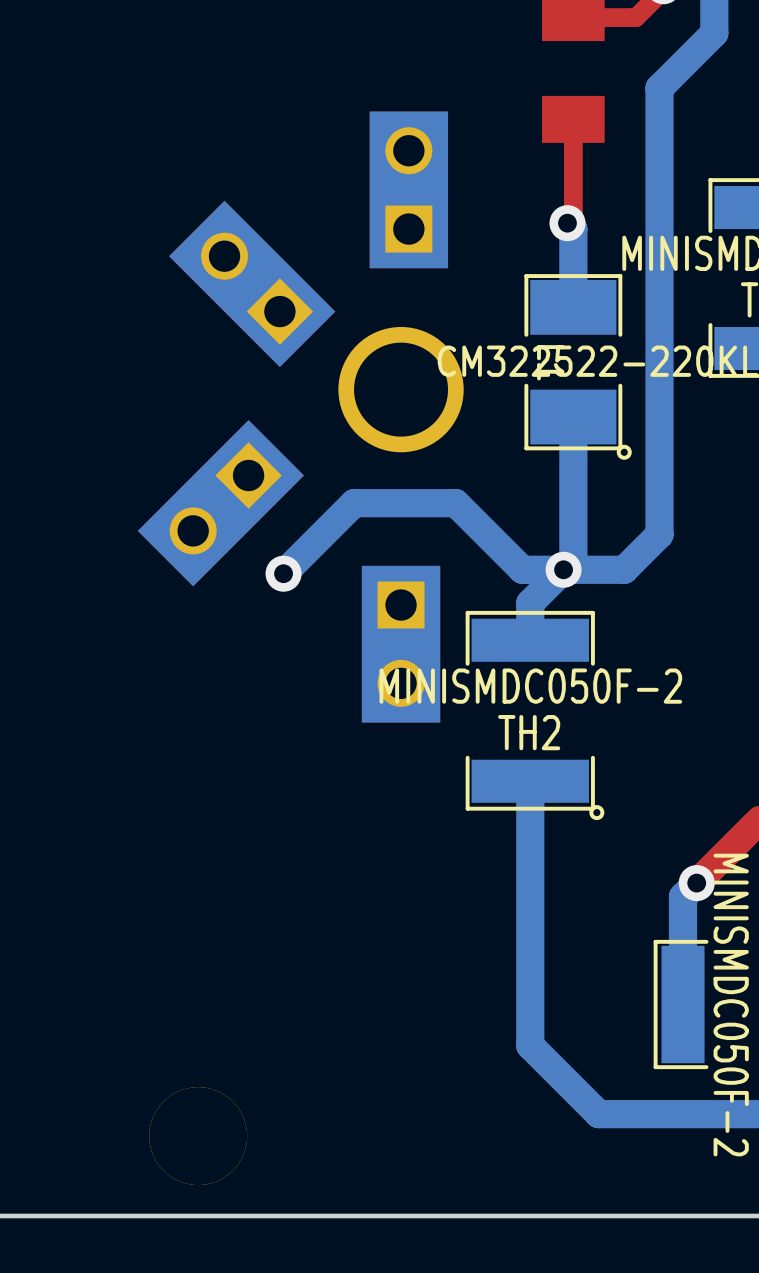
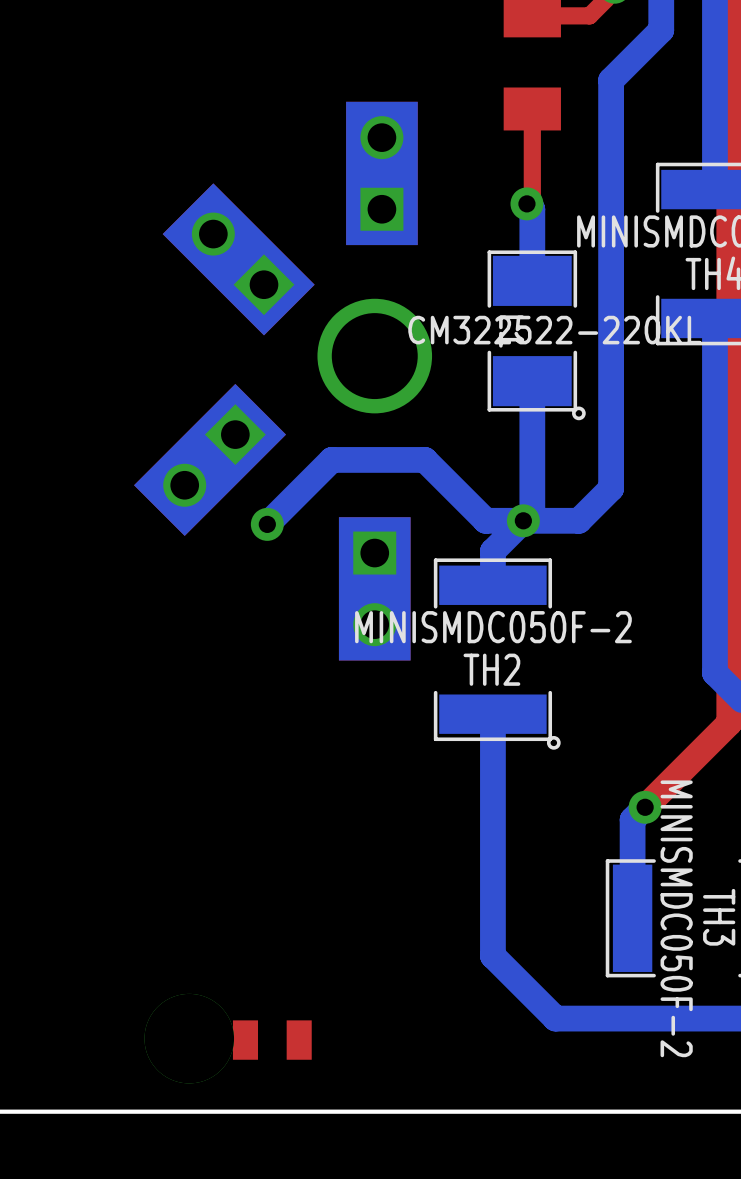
part: none -> (272, 1040)

